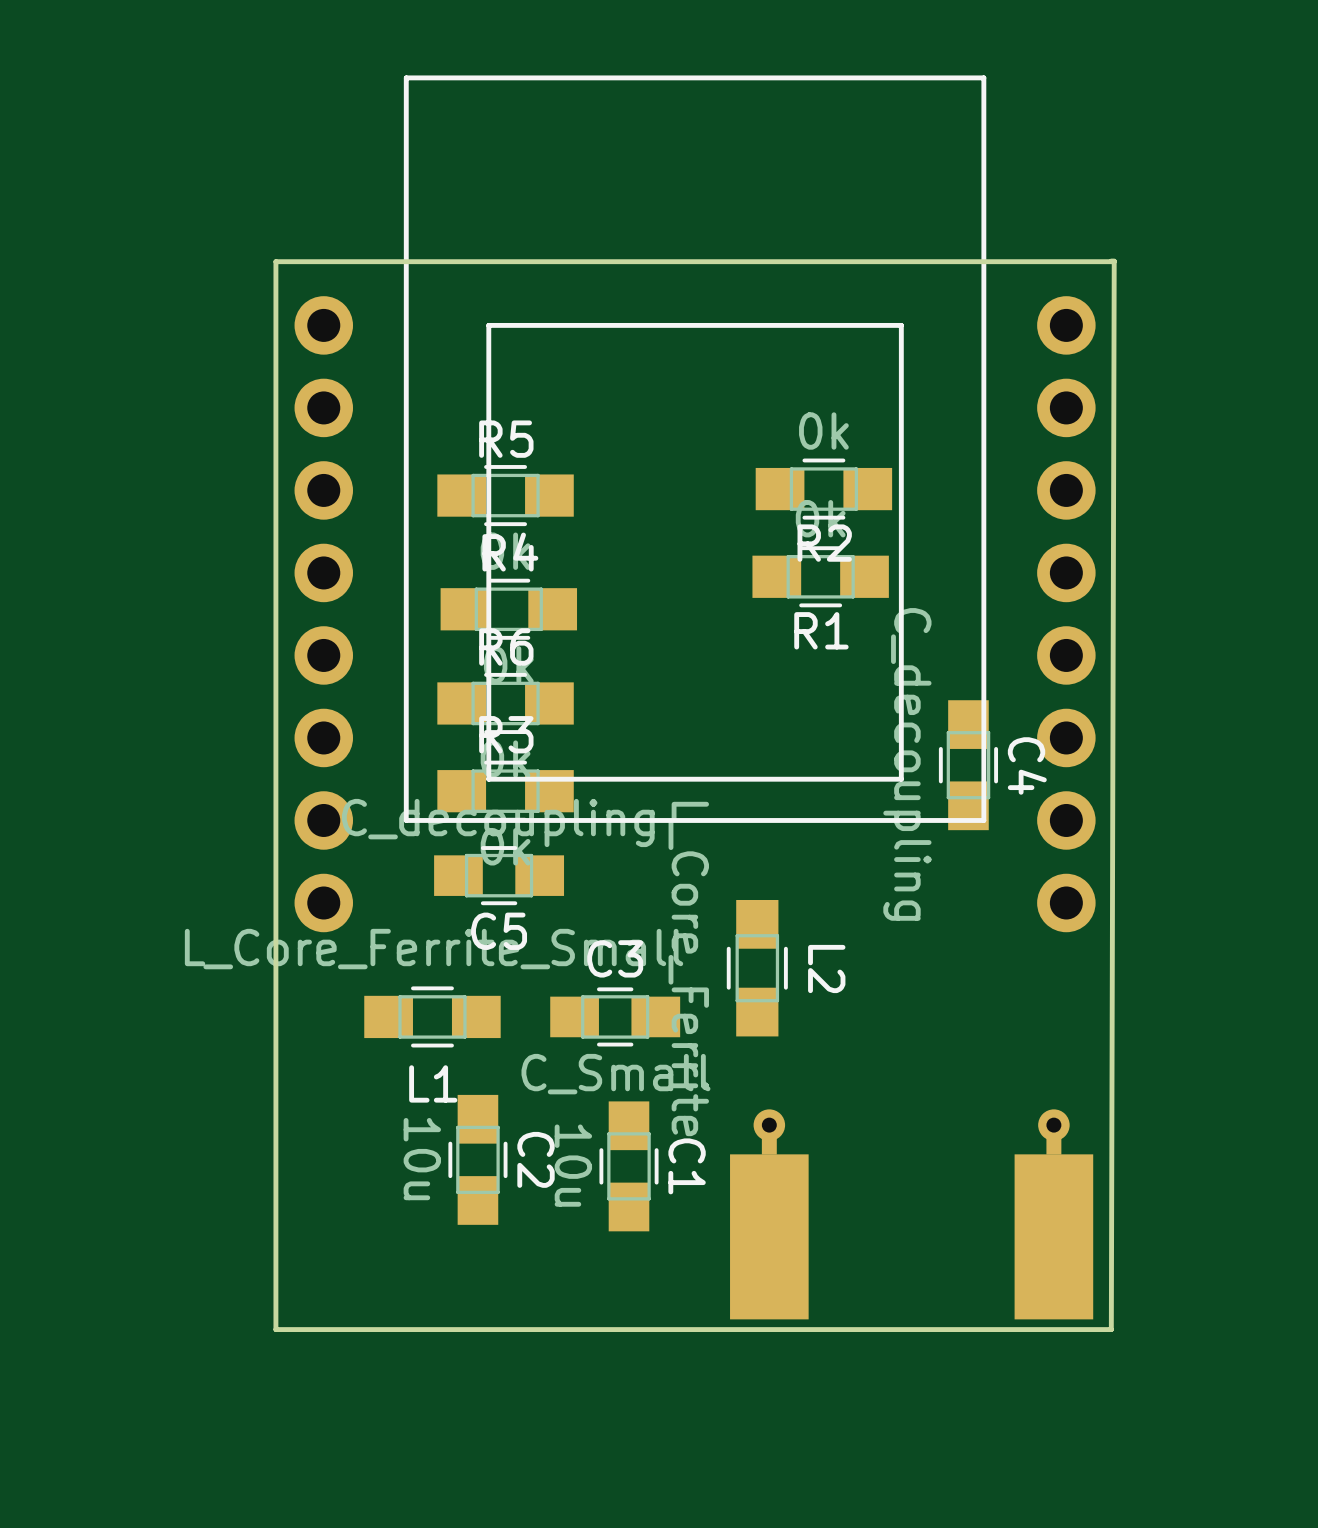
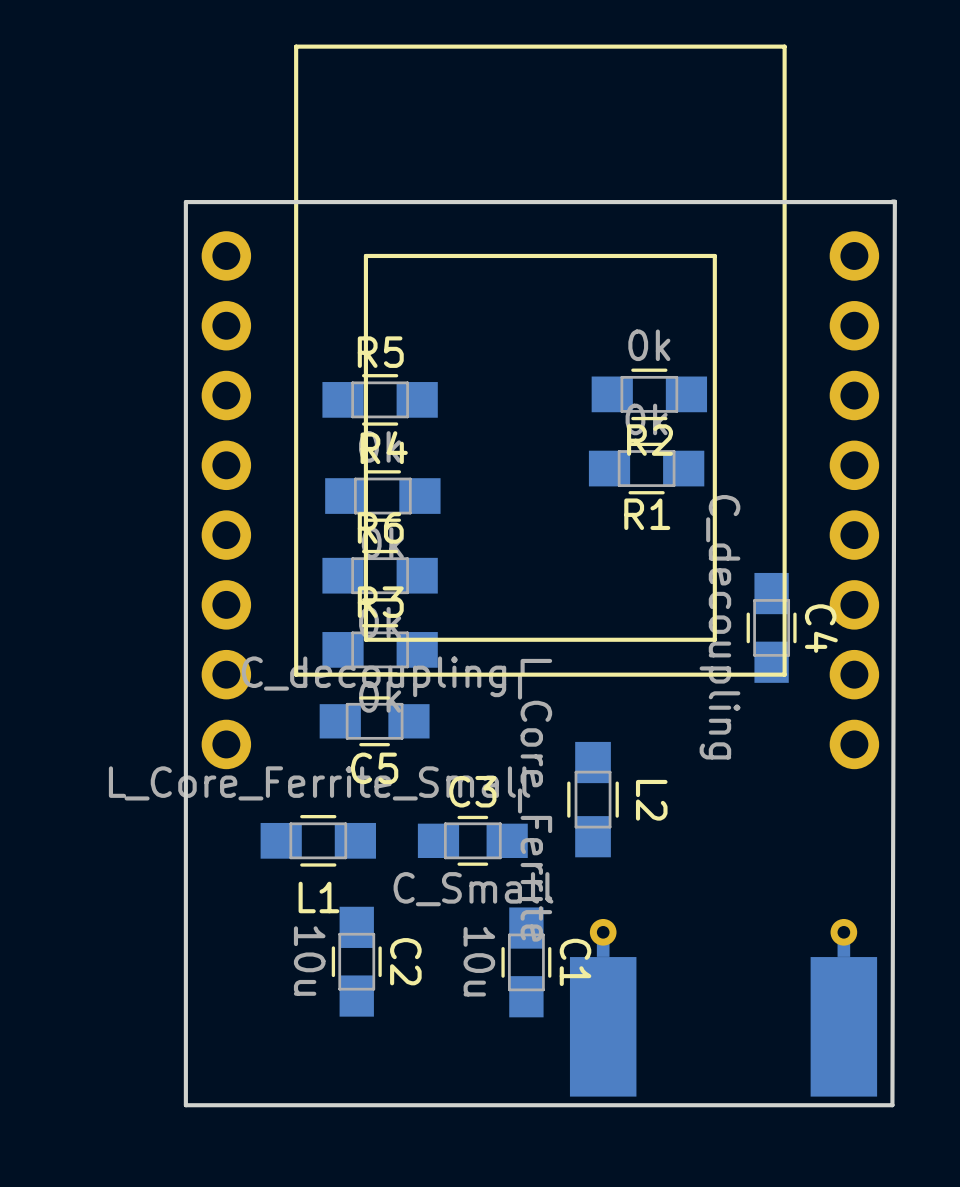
C1 position: (629, 1166) -> (526, 962)

